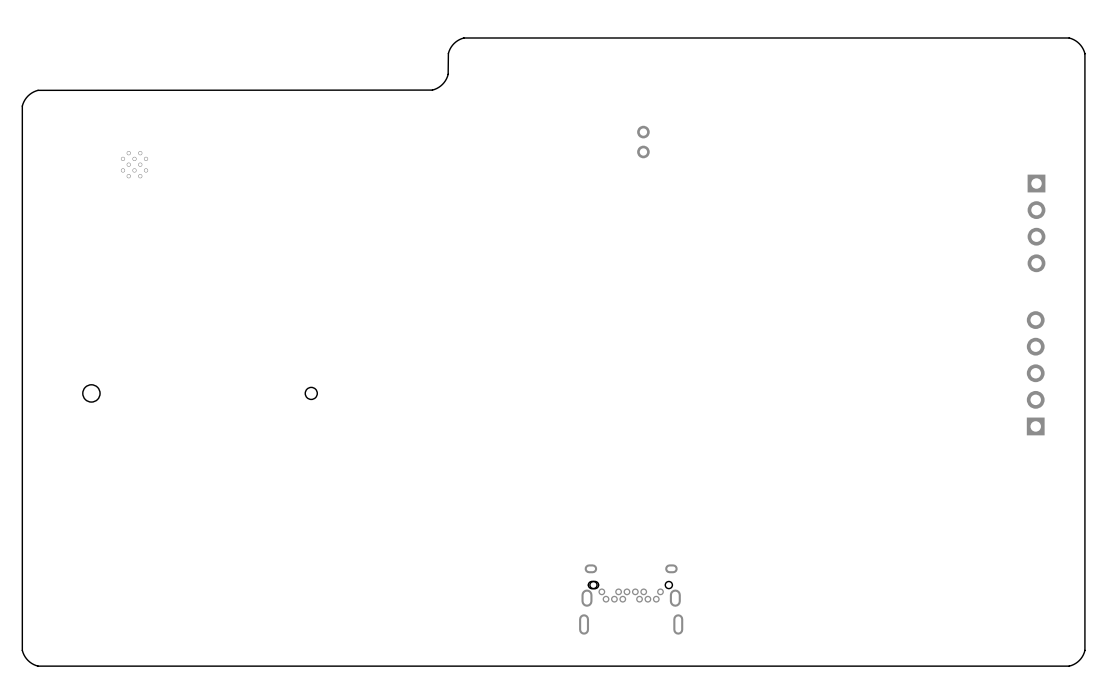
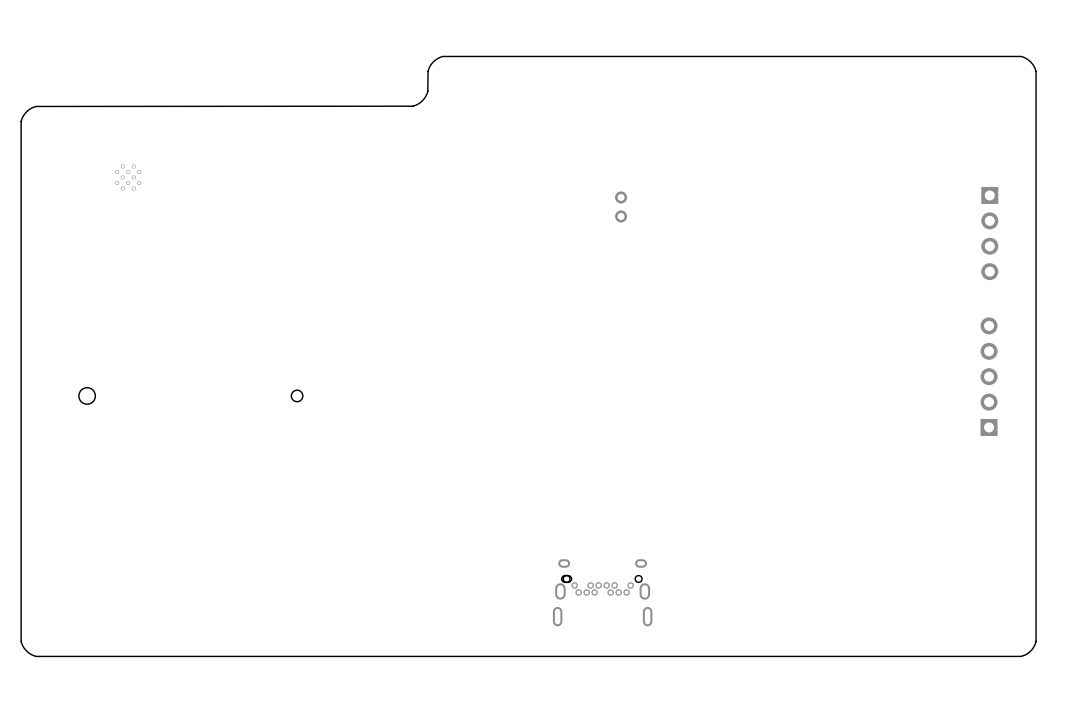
part position: (643, 142) -> (621, 206)

